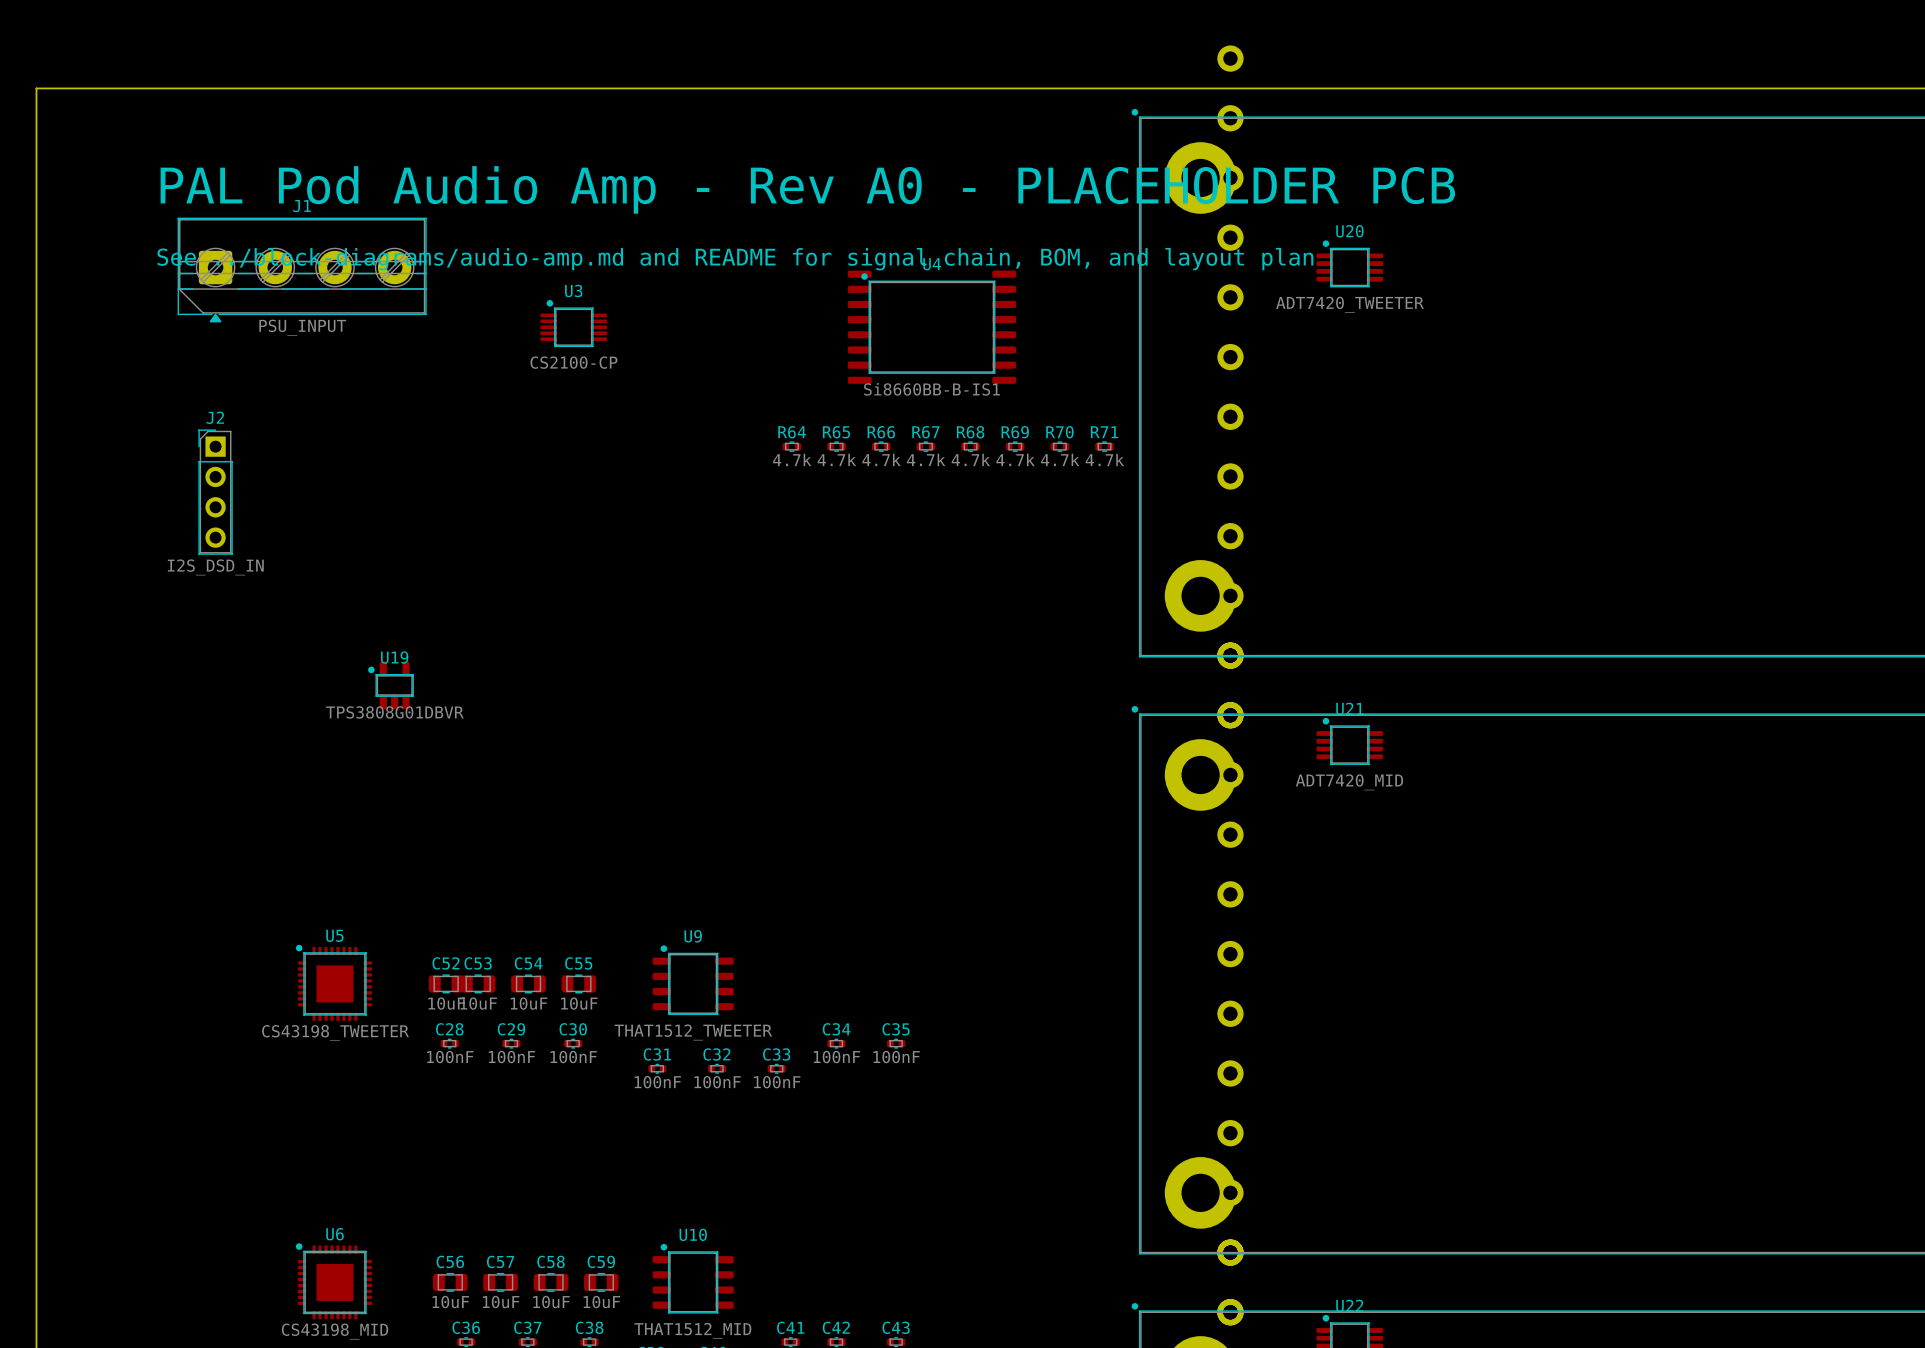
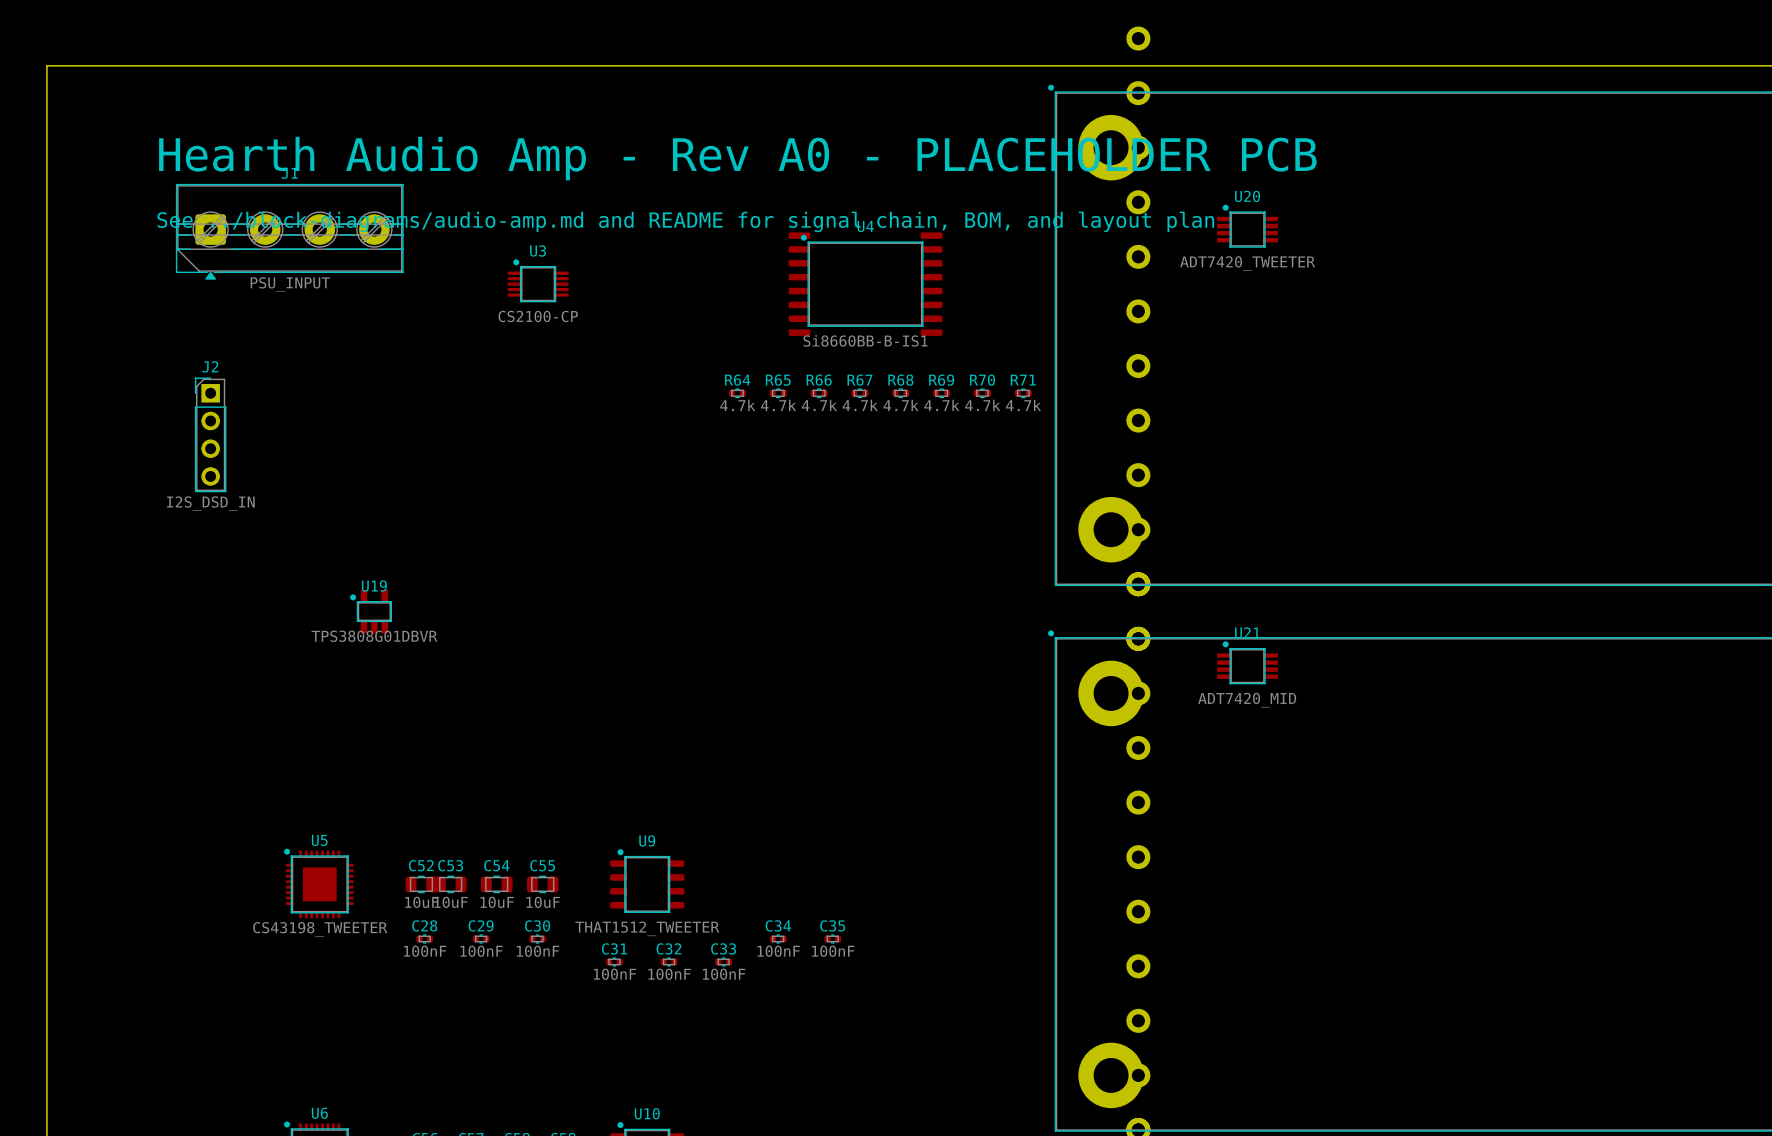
text: PAL Pod Audio Amp - Rev A0 - PLACEHOLDER PCB (807, 189) -> Hearth Audio Amp - Rev A0 - PLACEHOLDER PCB (737, 158)

